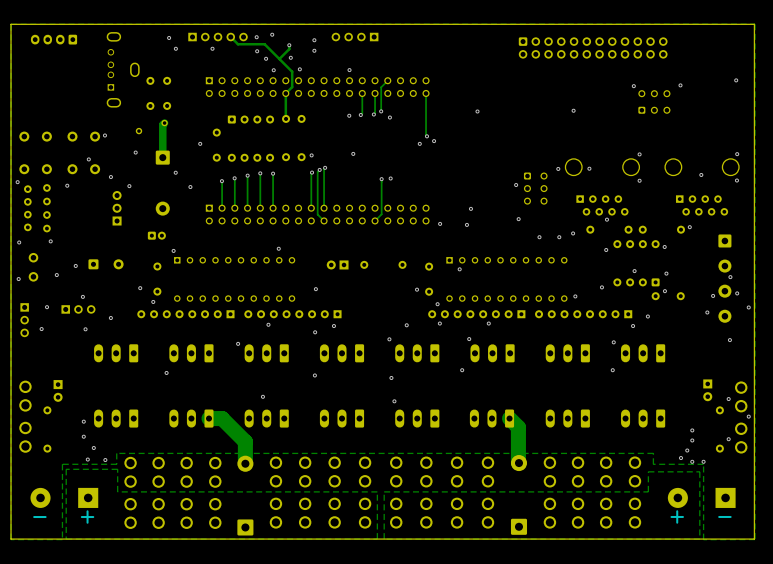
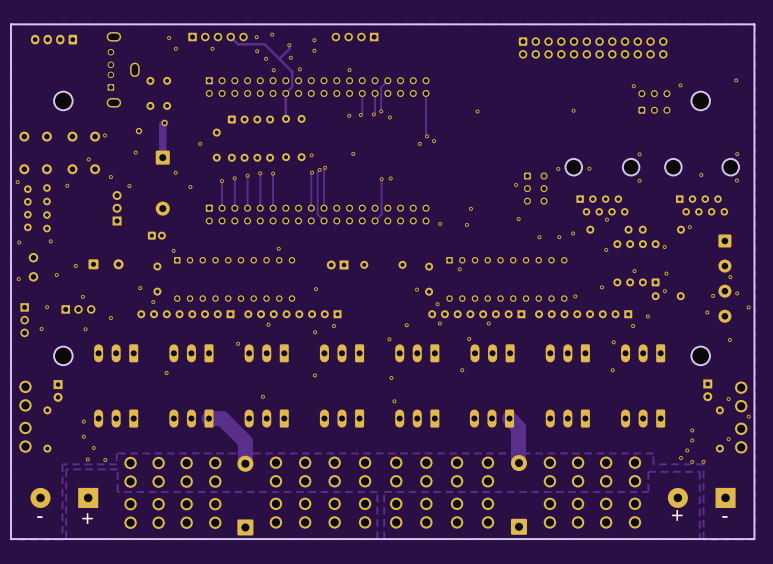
part: none -> (63, 100)
part: none -> (700, 100)
part: none -> (63, 355)
part: none -> (700, 355)

